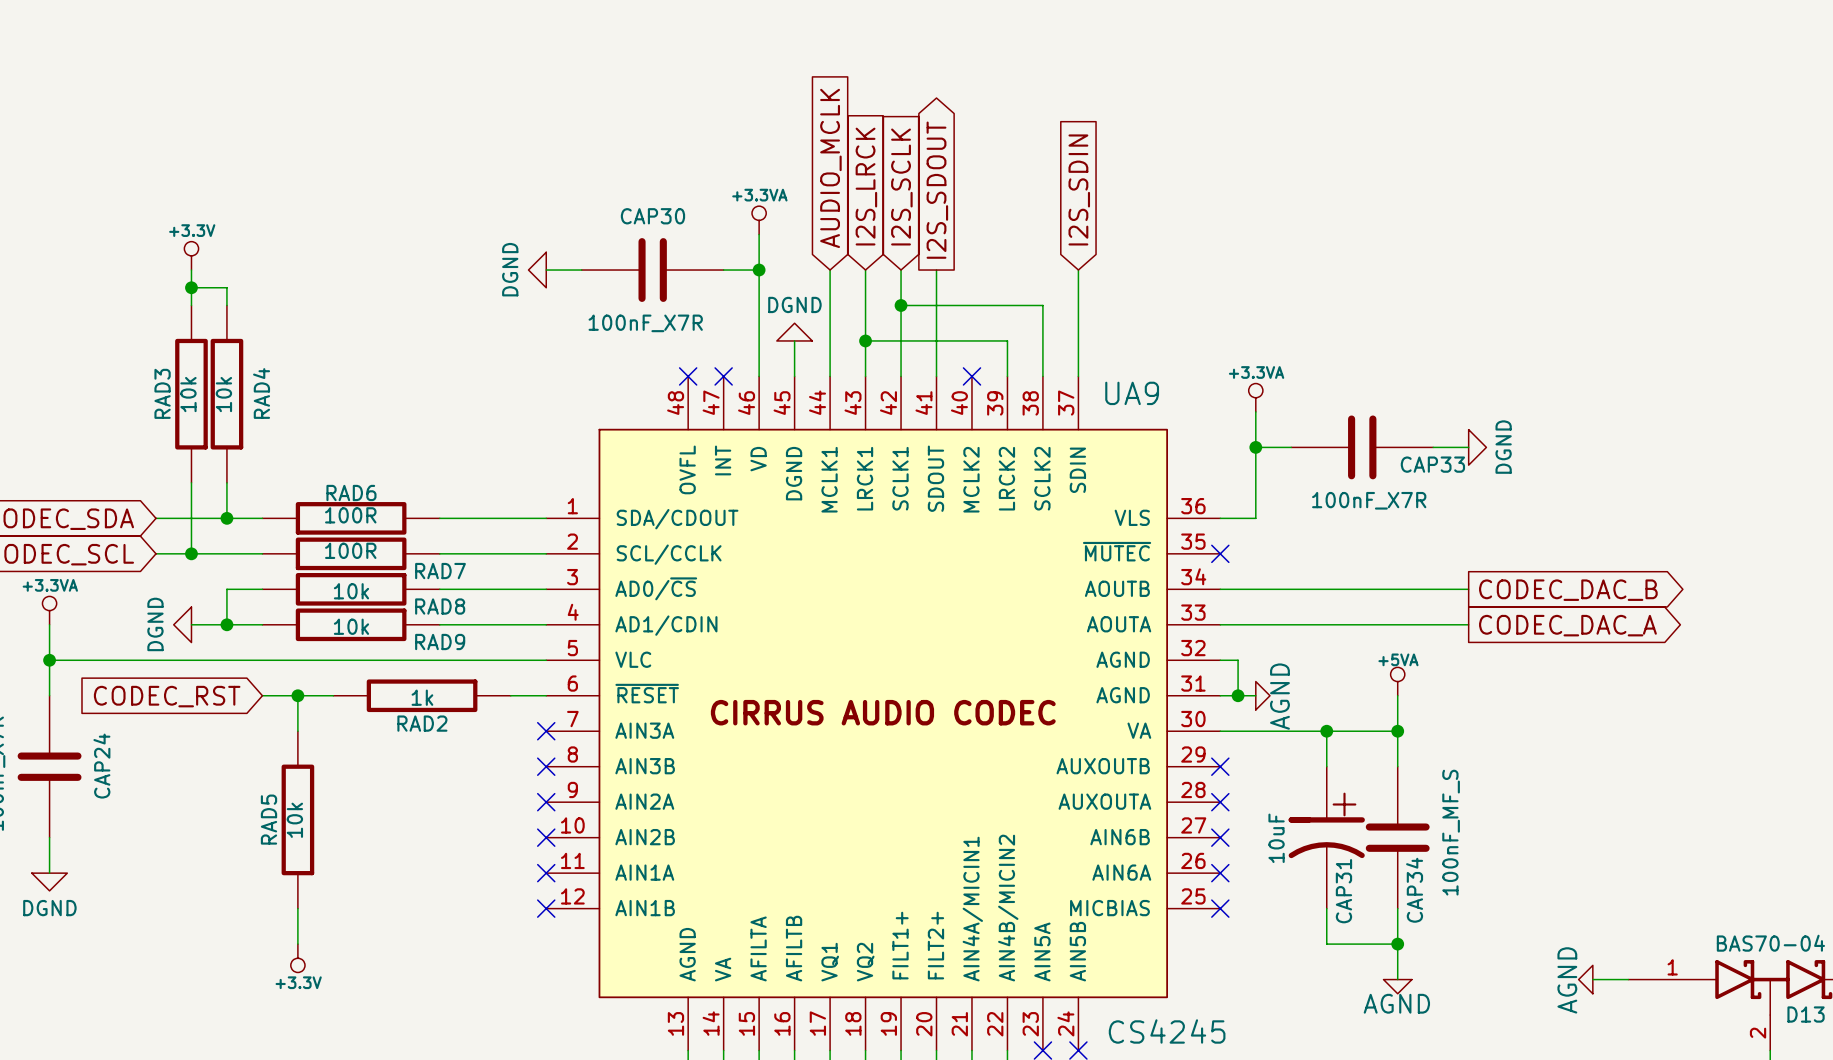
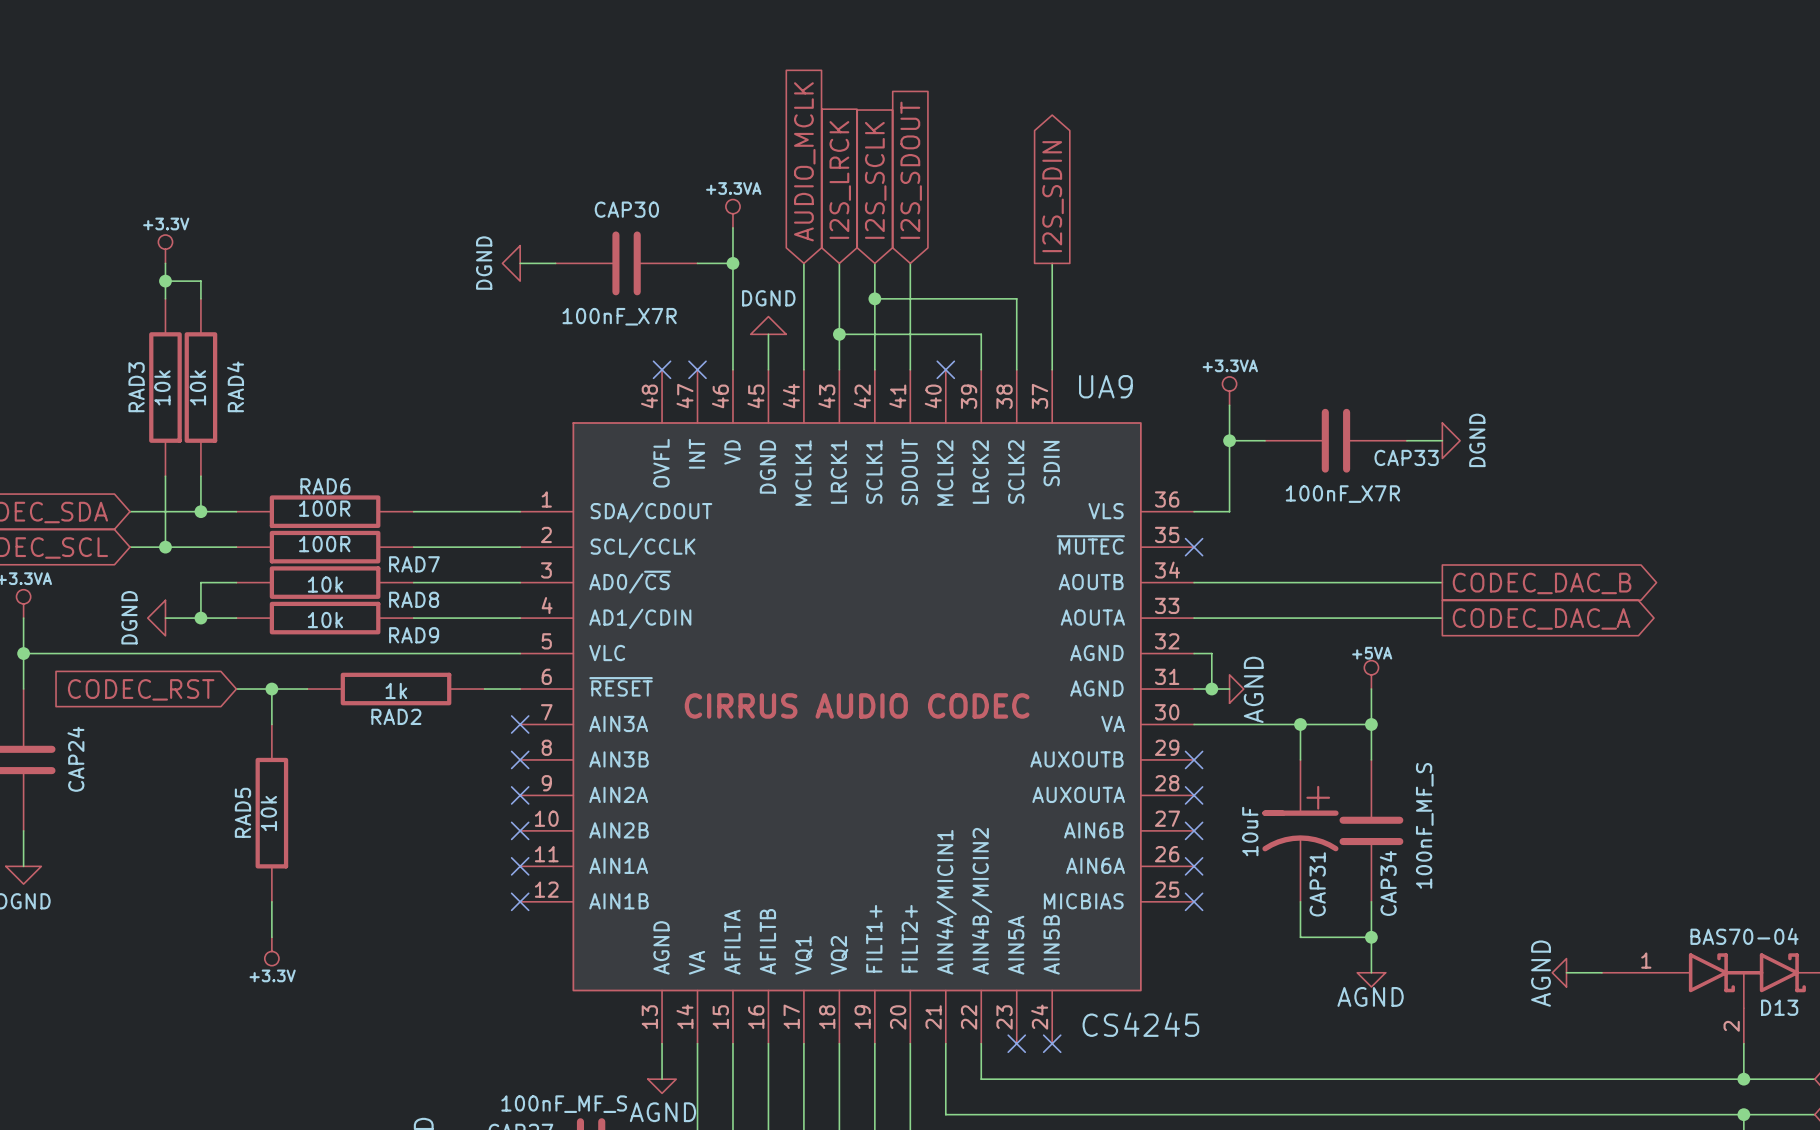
global label shape: input (1079, 189) -> output (1053, 196)
global label shape: output (937, 190) -> input (911, 170)

